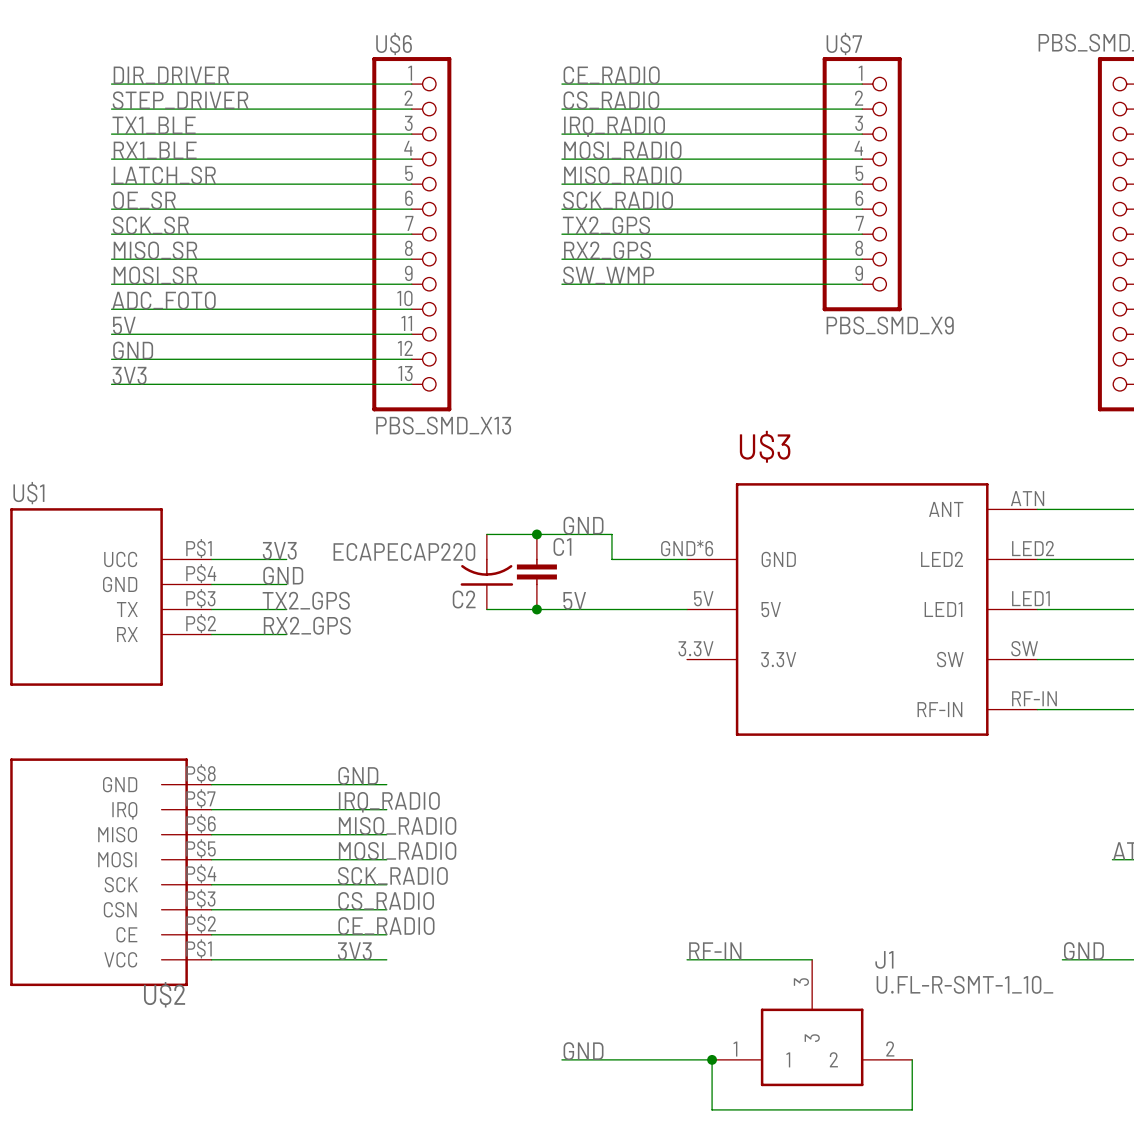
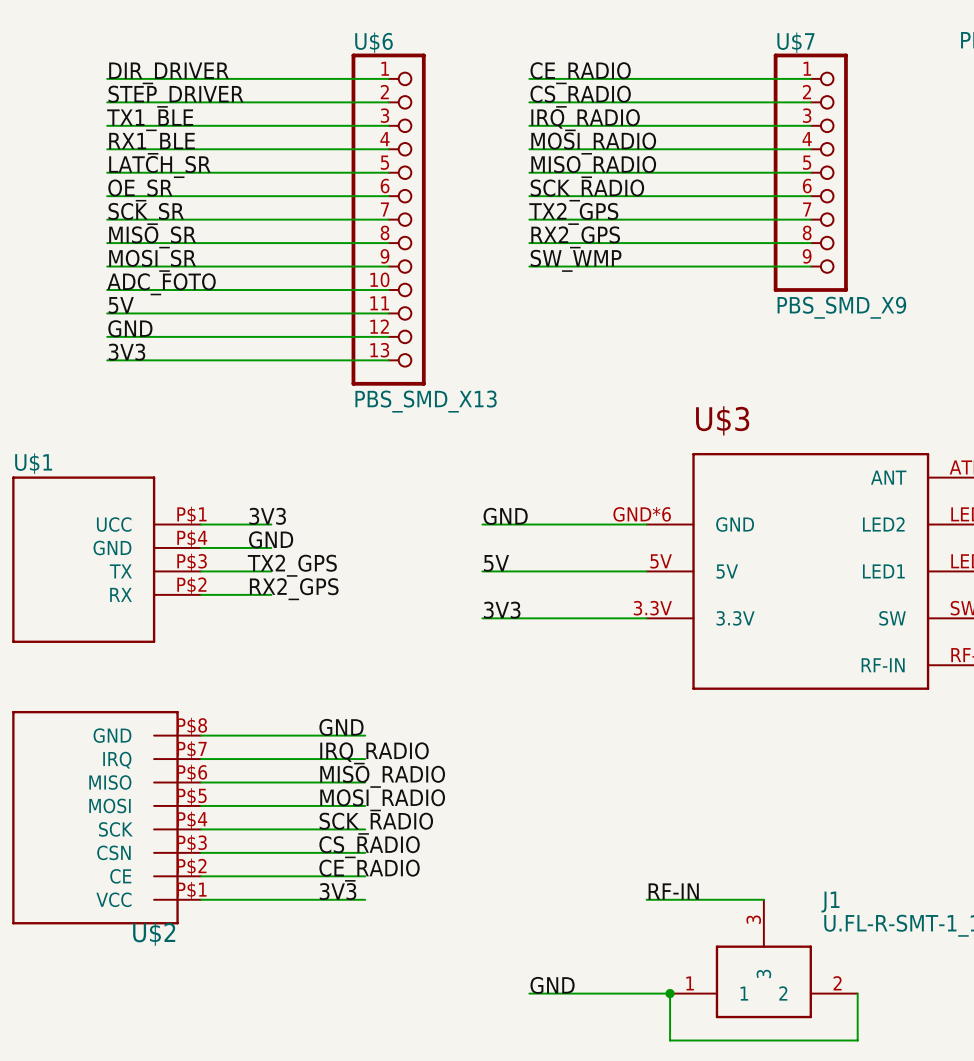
label position: GND (583, 525) -> GND (505, 516)
wire: (486, 534) (611, 534) (611, 559) -> (482, 524) (576, 524)
junction: (536, 534) -> none
C2: ECAPECAP220 (486, 571) -> none
C1: (536, 571) -> none
label position: 5V (574, 600) -> 5V (496, 563)
wire: (486, 609) (511, 609) -> none
junction: (536, 609) -> none
label: none -> 3V3 (502, 610)
wire: none -> (482, 618) (646, 618)

